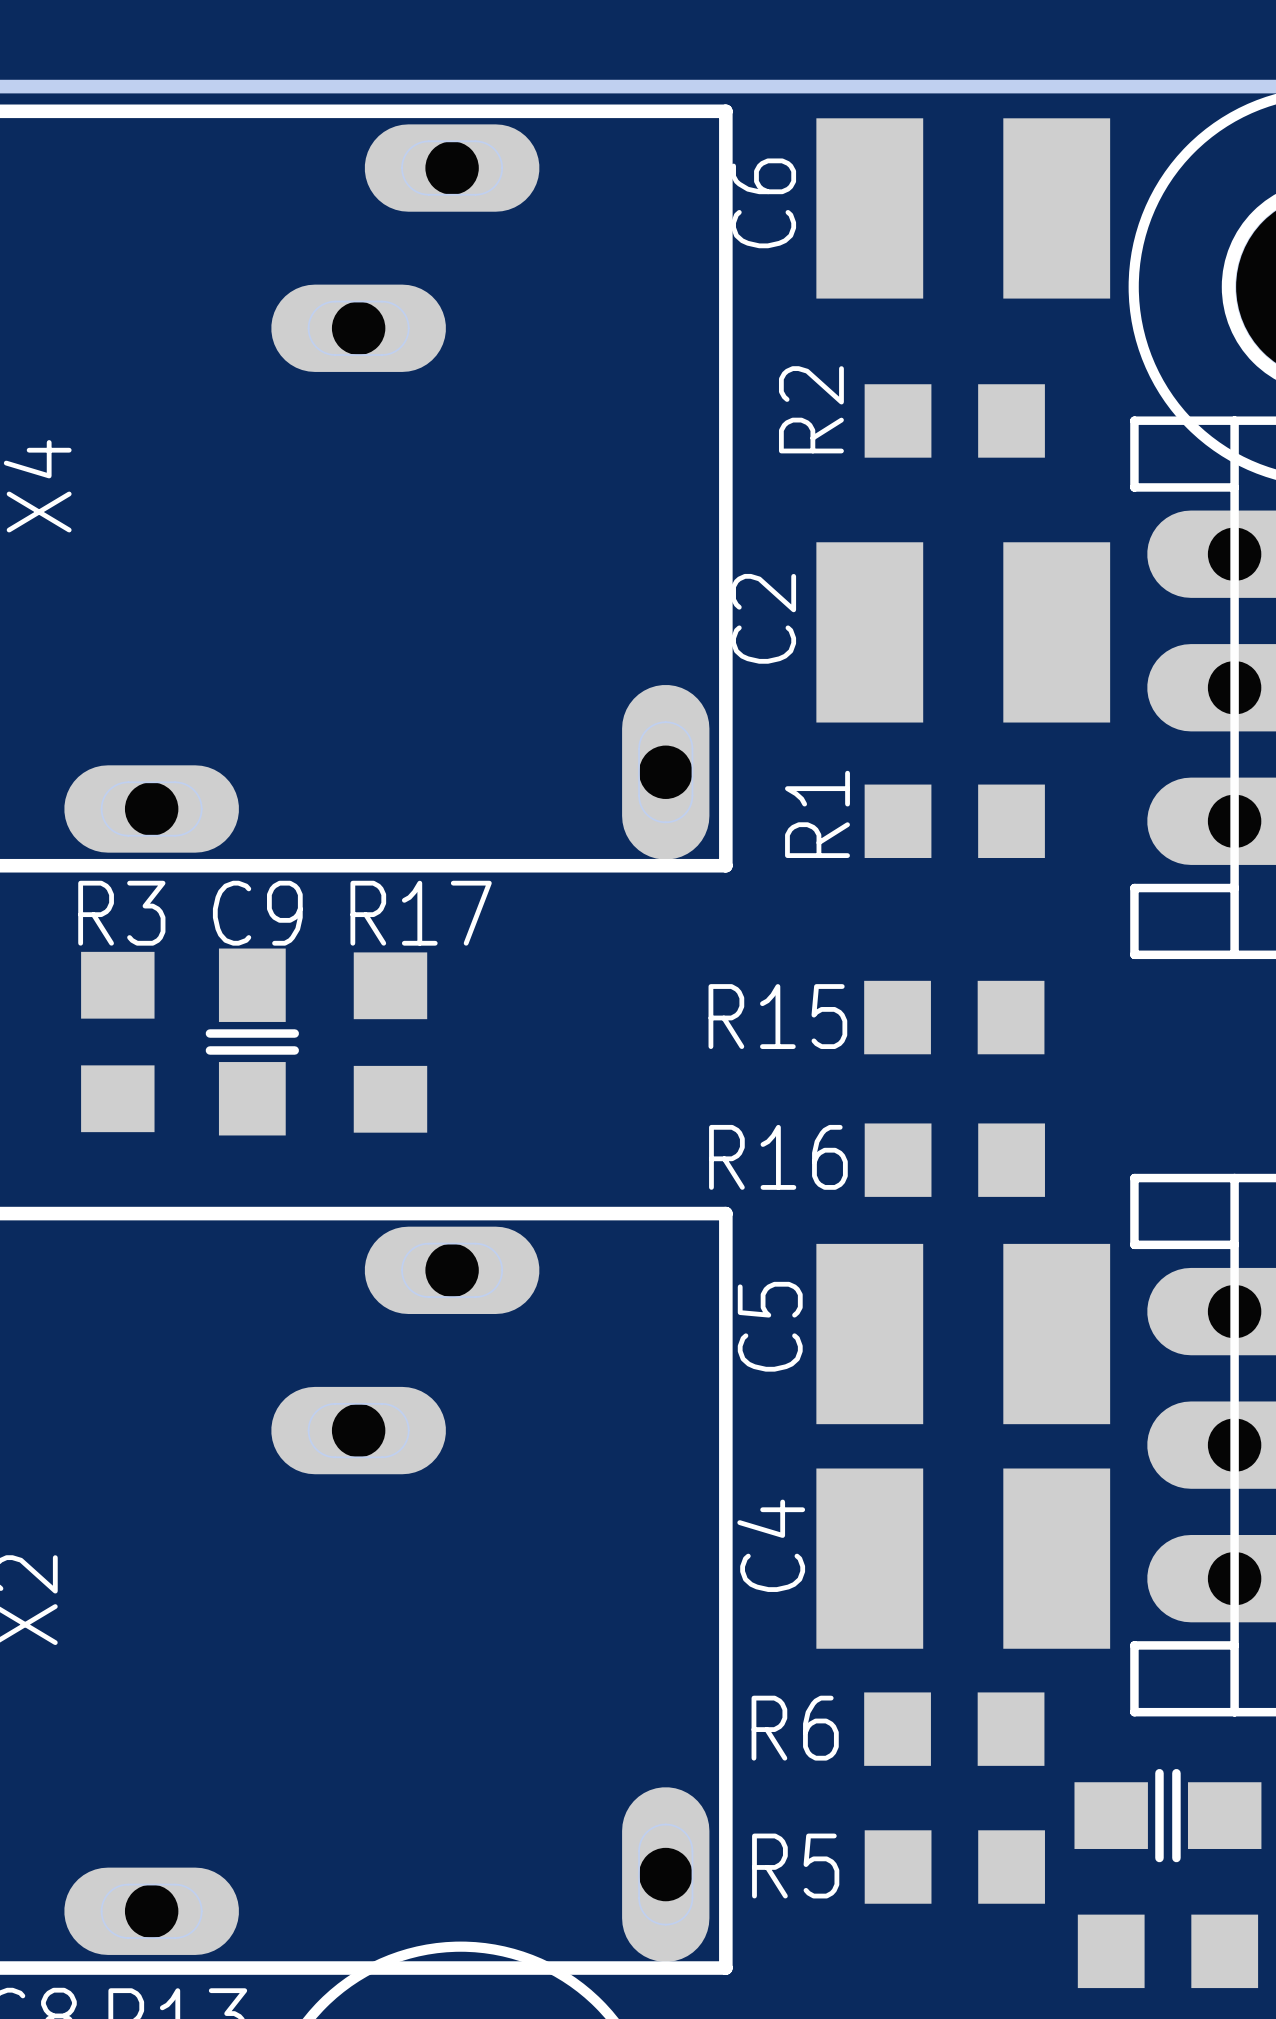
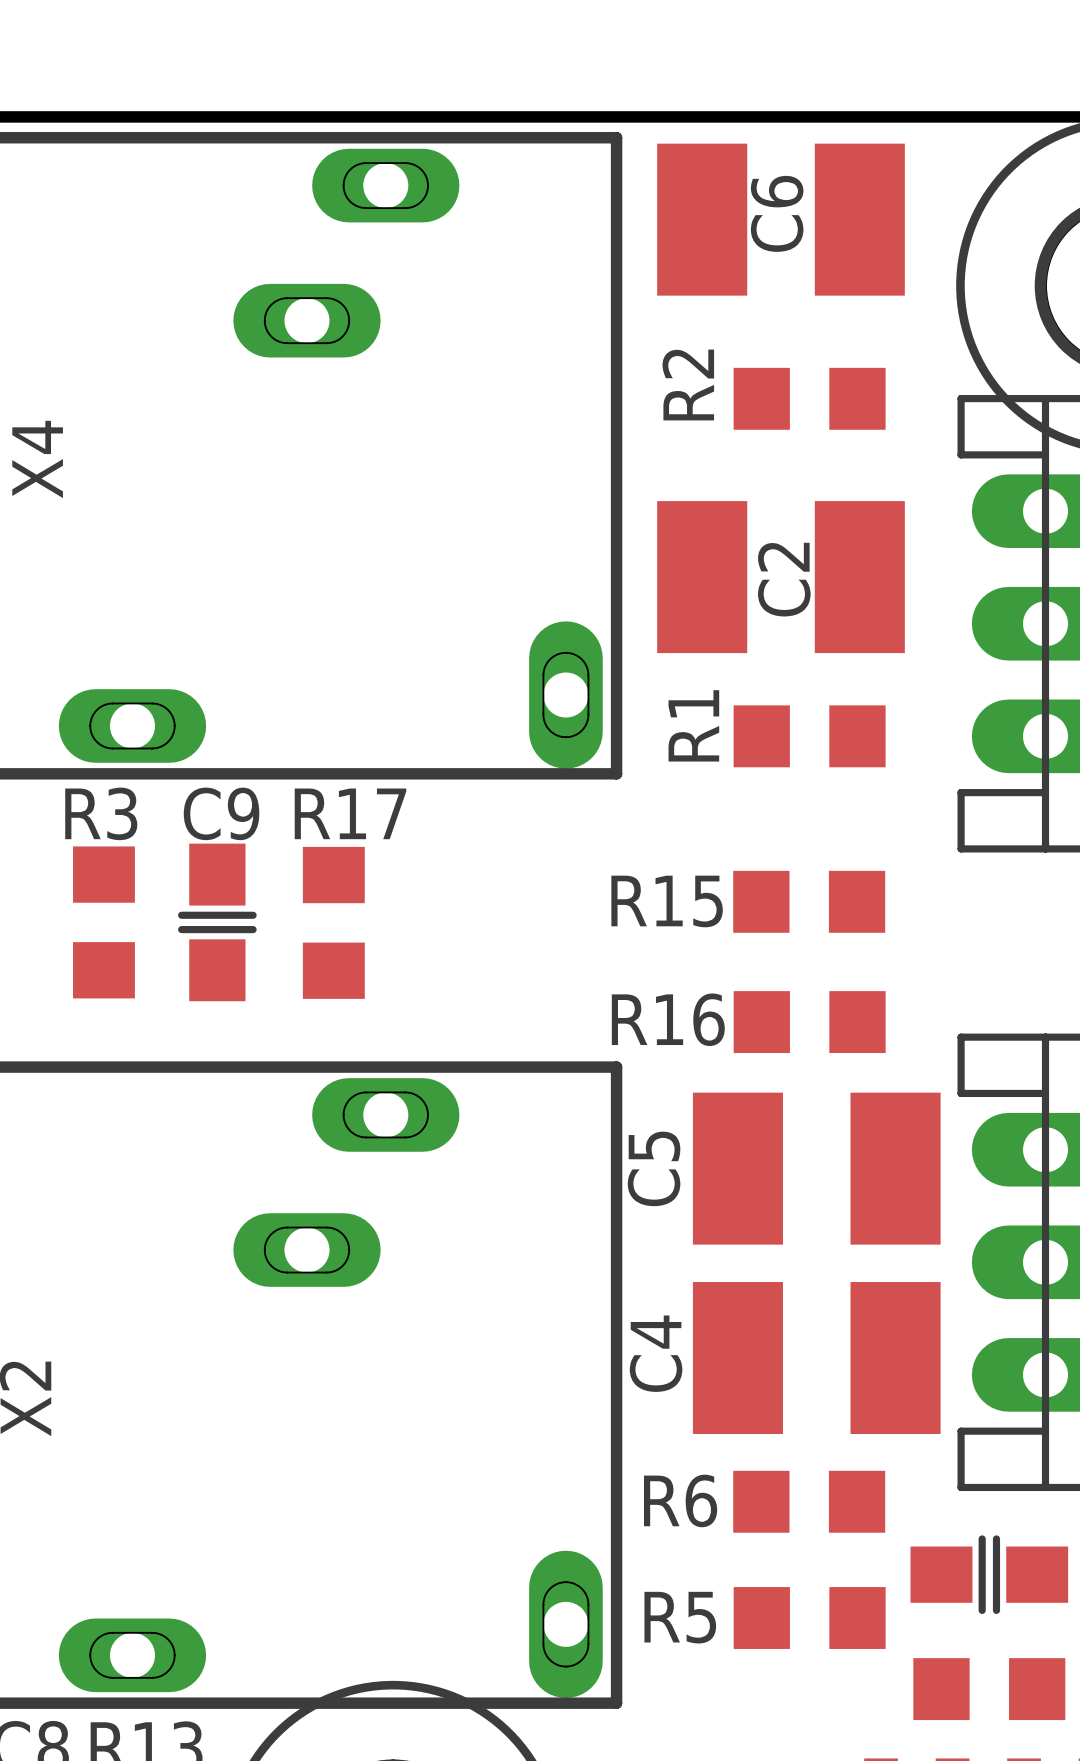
C6 name position: C6 (763, 203) -> C6 (777, 213)
C6 position: (963, 208) -> (781, 219)
C2 name position: C2 (763, 618) -> C2 (784, 579)
C2 position: (963, 632) -> (781, 577)

